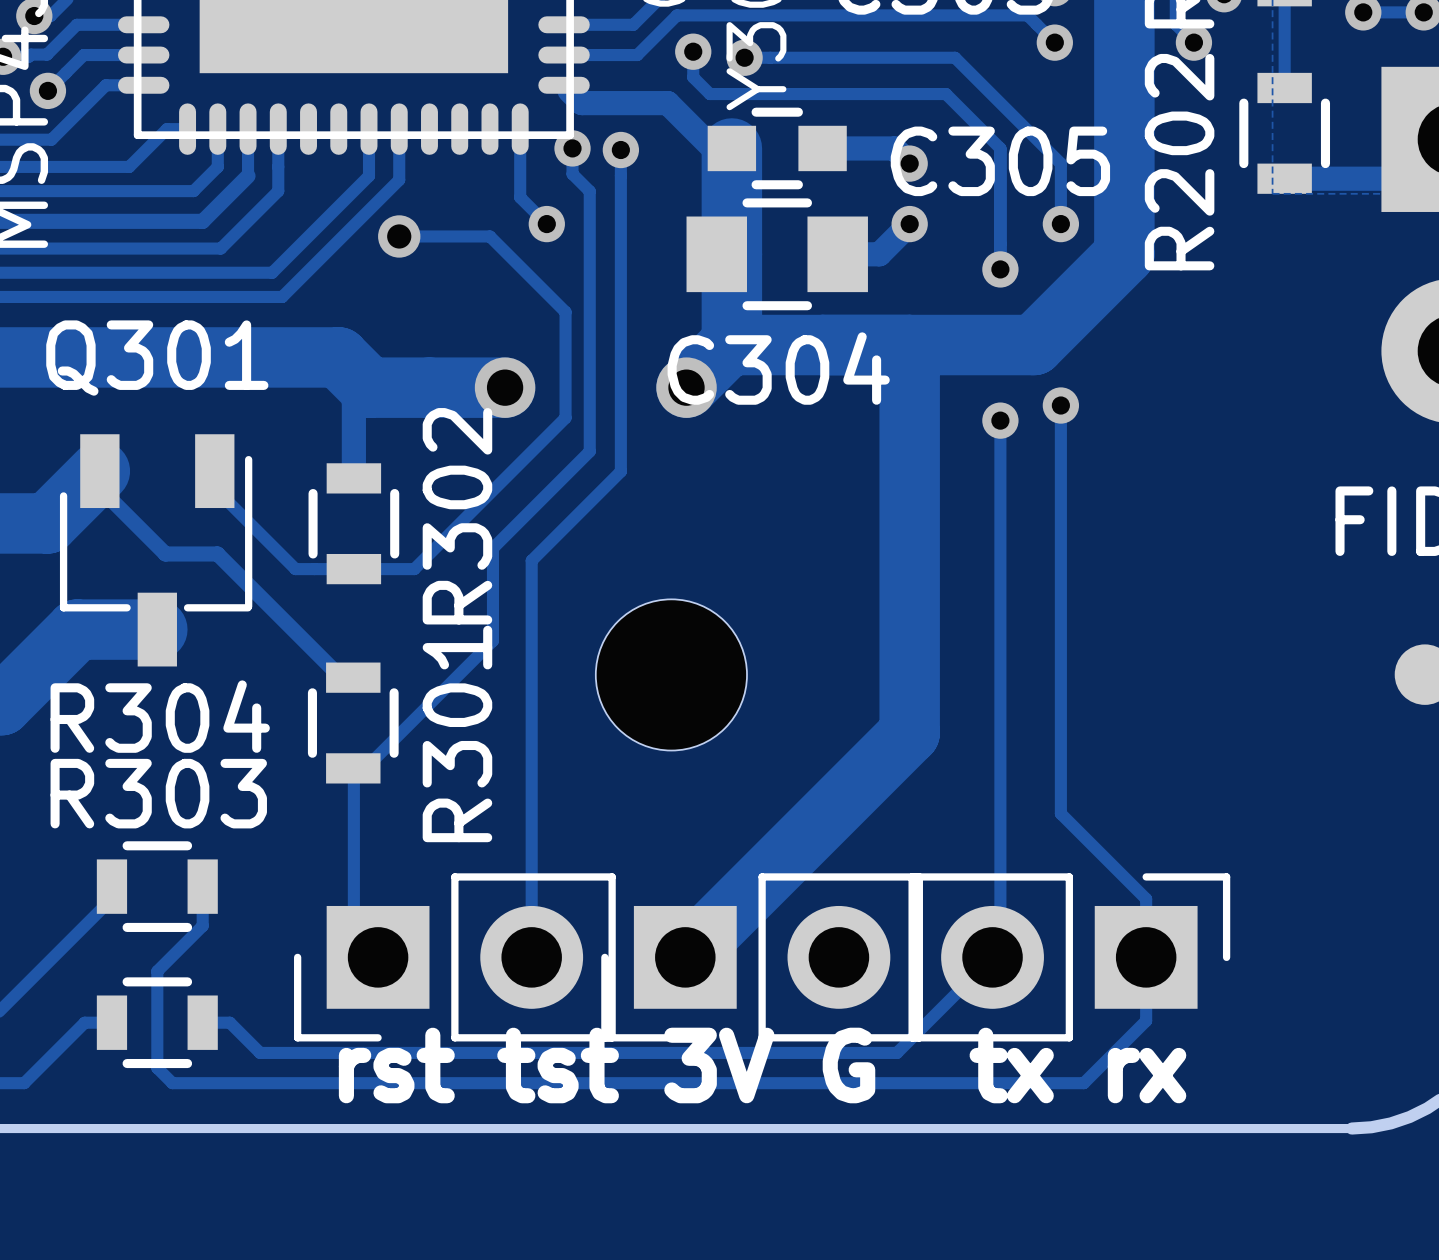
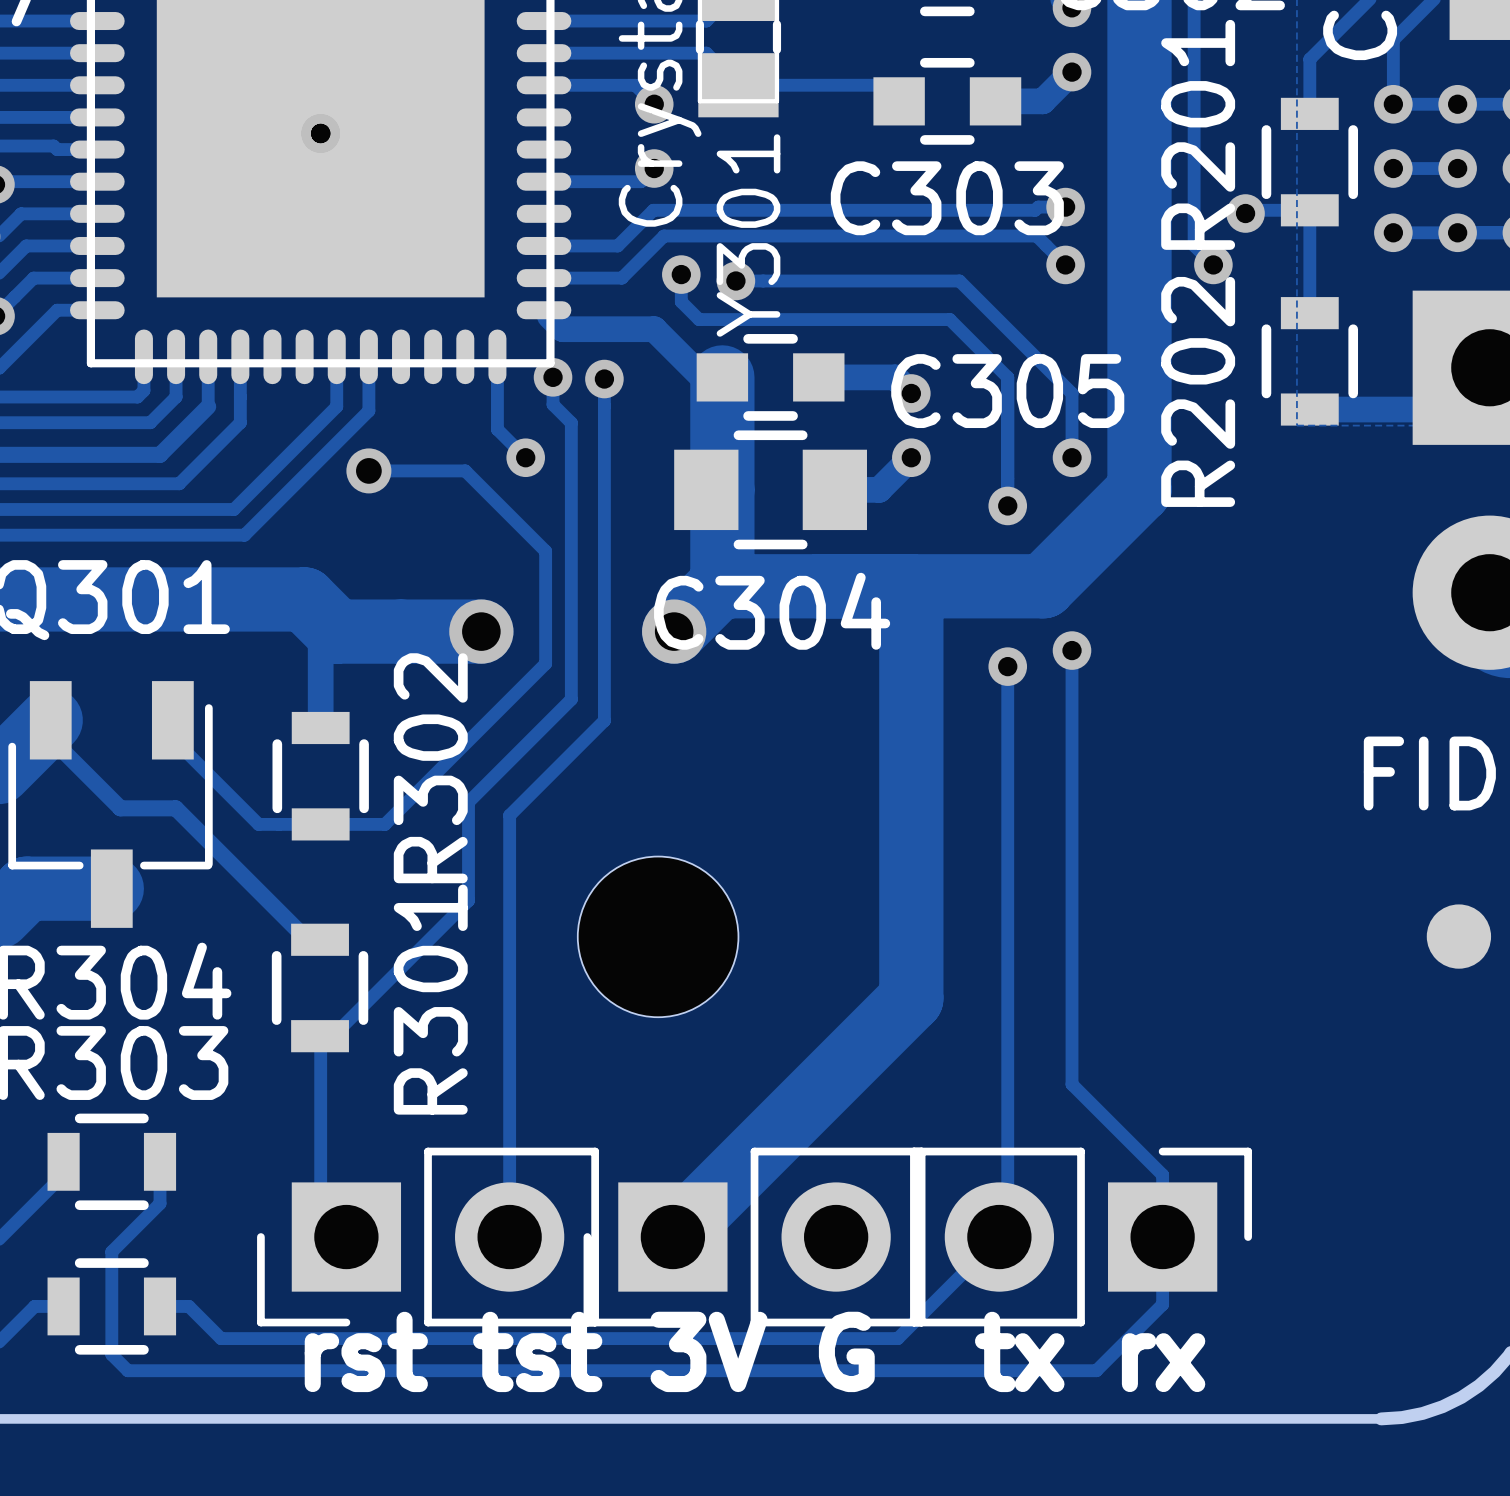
track: (187, 129) (167, 129) (129, 166) -> (143, 356) (143, 390) (137, 397) (81, 397)

